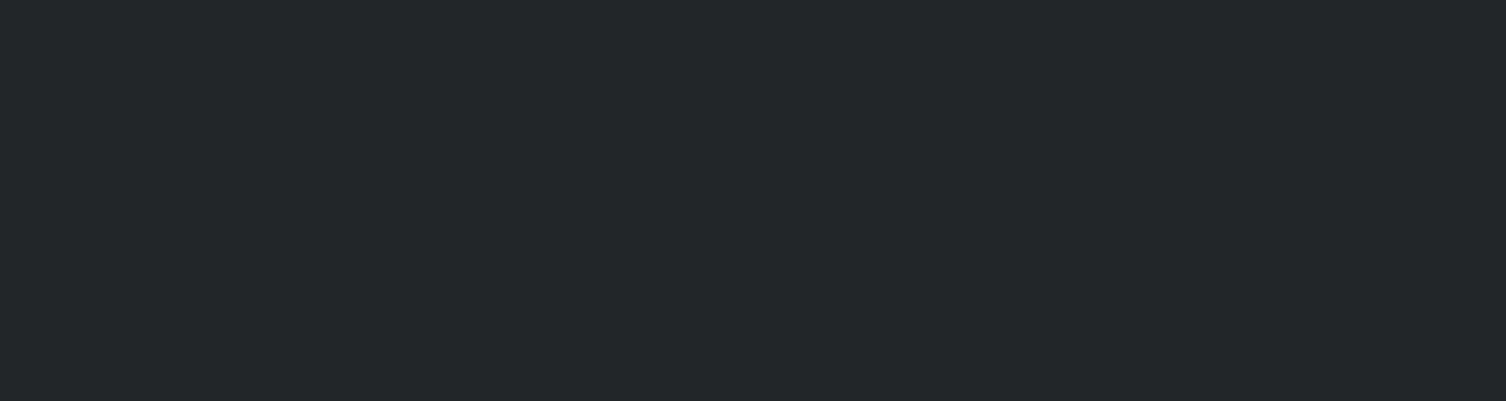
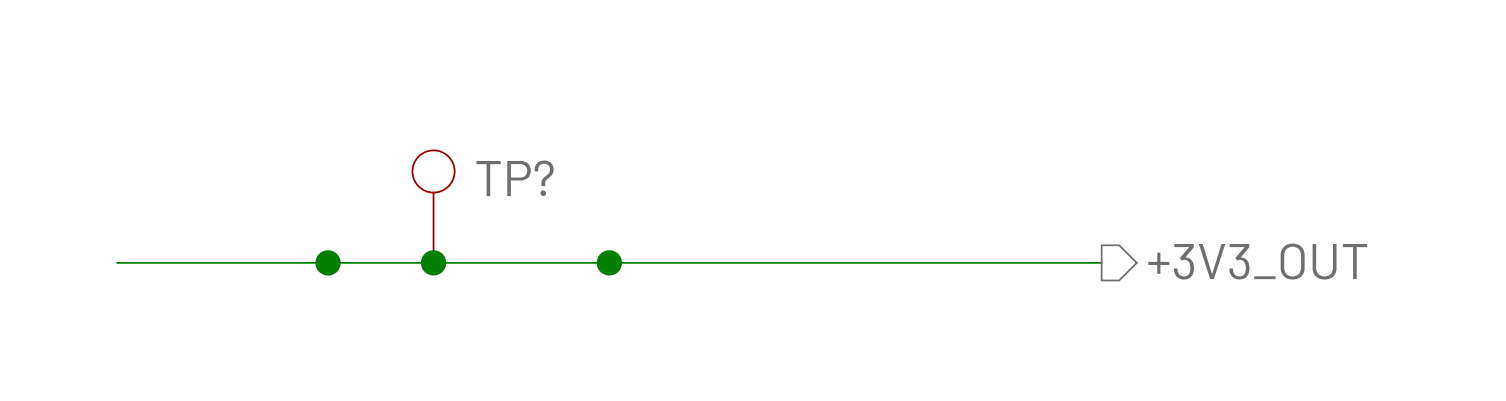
TP?: none -> (433, 206)
wire: none -> (117, 262) (1101, 262)
junction: none -> (328, 262)
junction: none -> (433, 262)
junction: none -> (609, 262)
hierarchical label: none -> +3V3_OUT (1257, 261)

